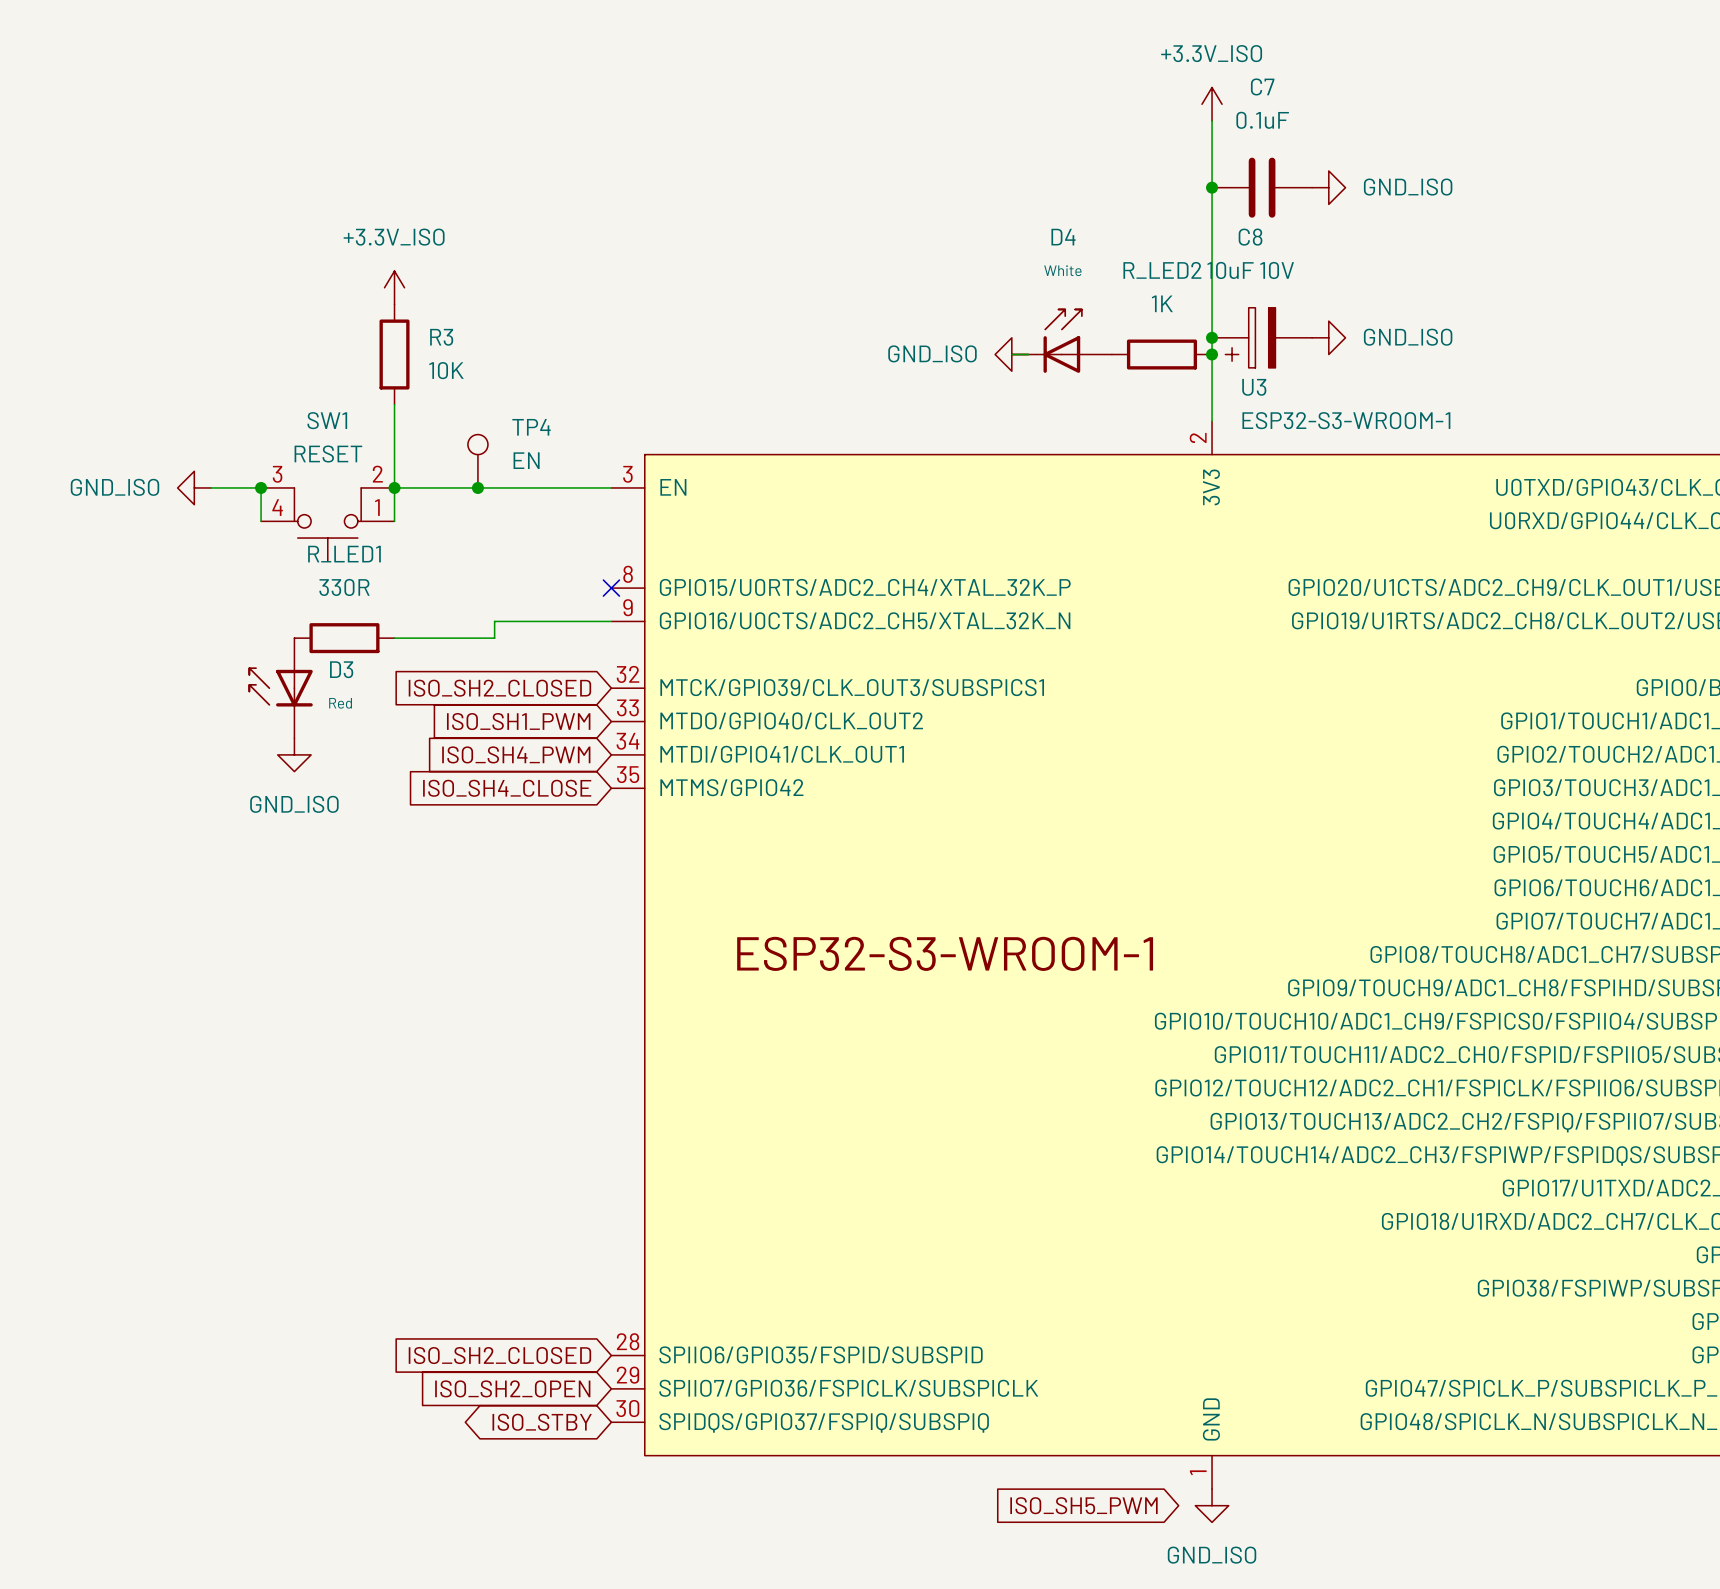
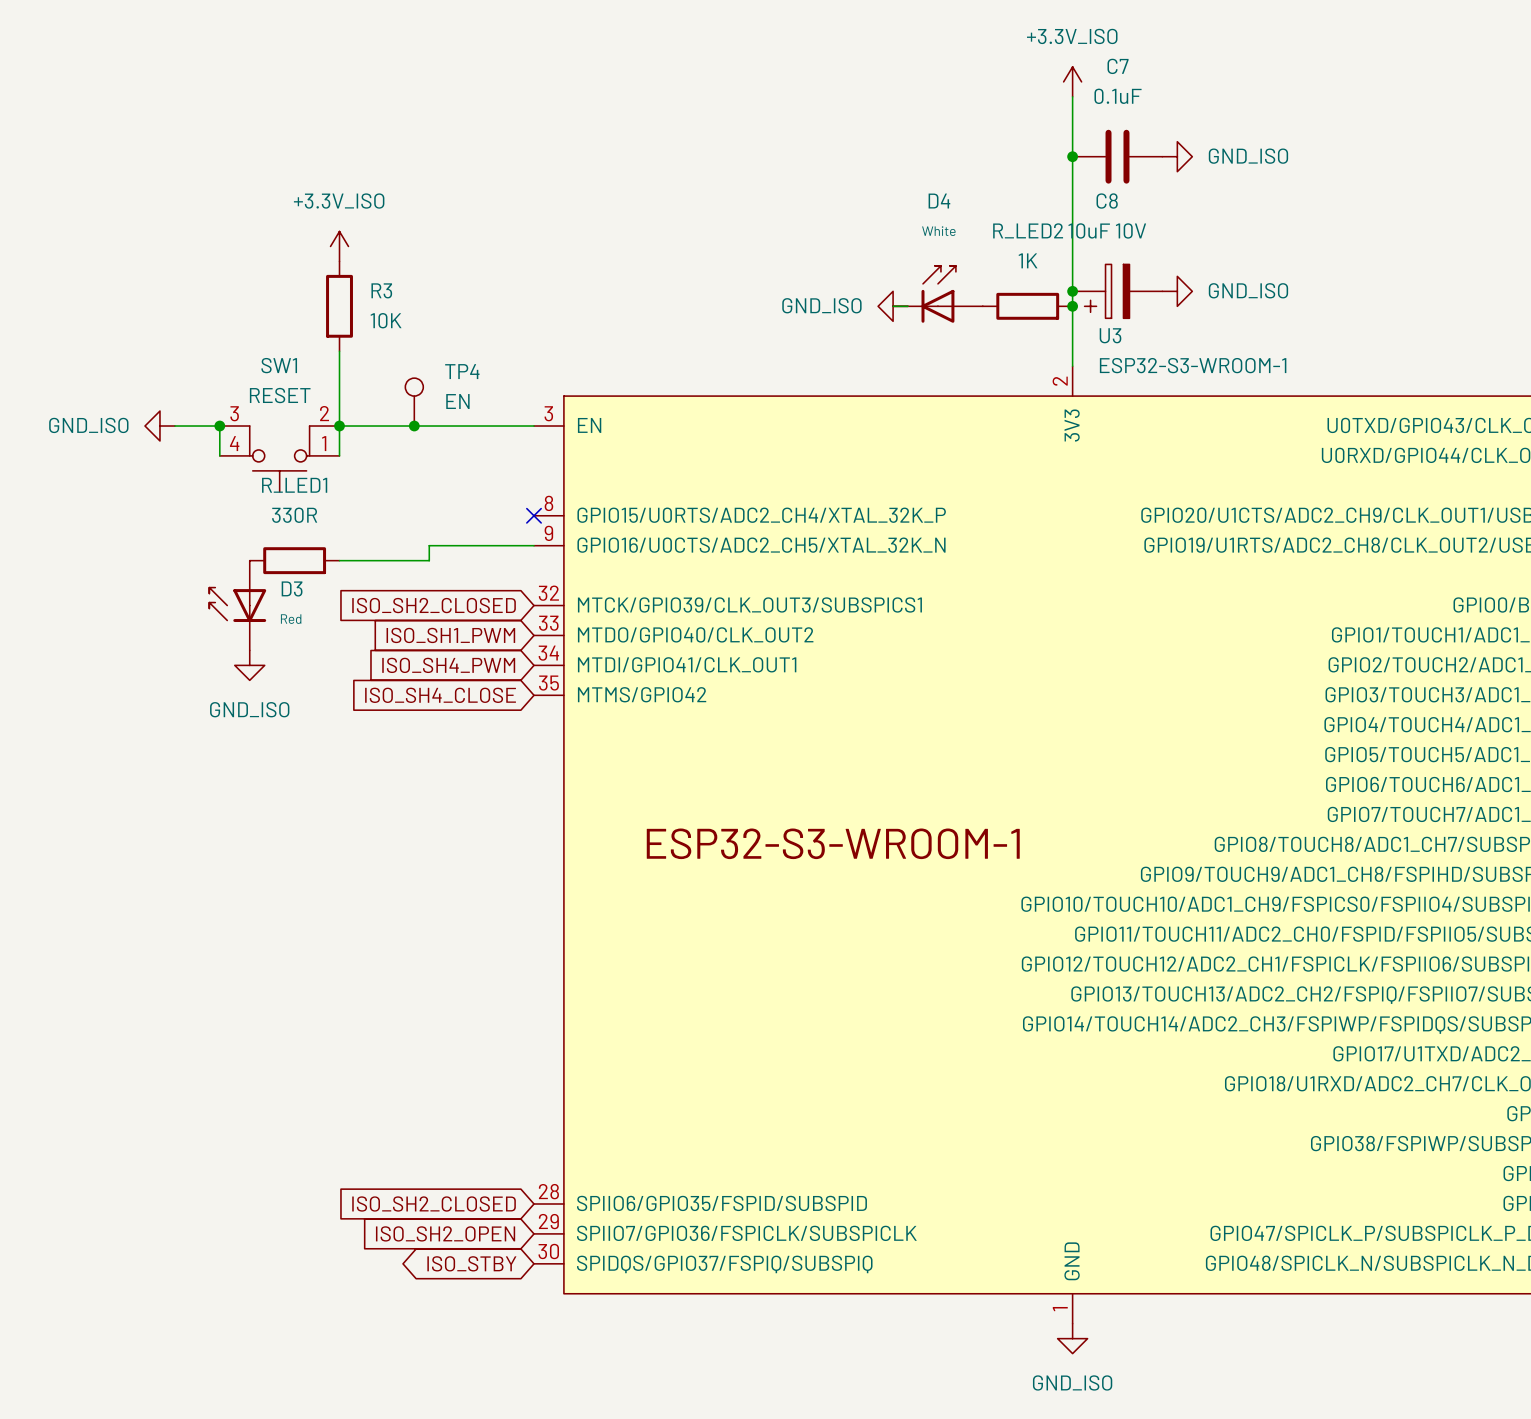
global label: ISO_SH5_PWM (1083, 1505) -> none

